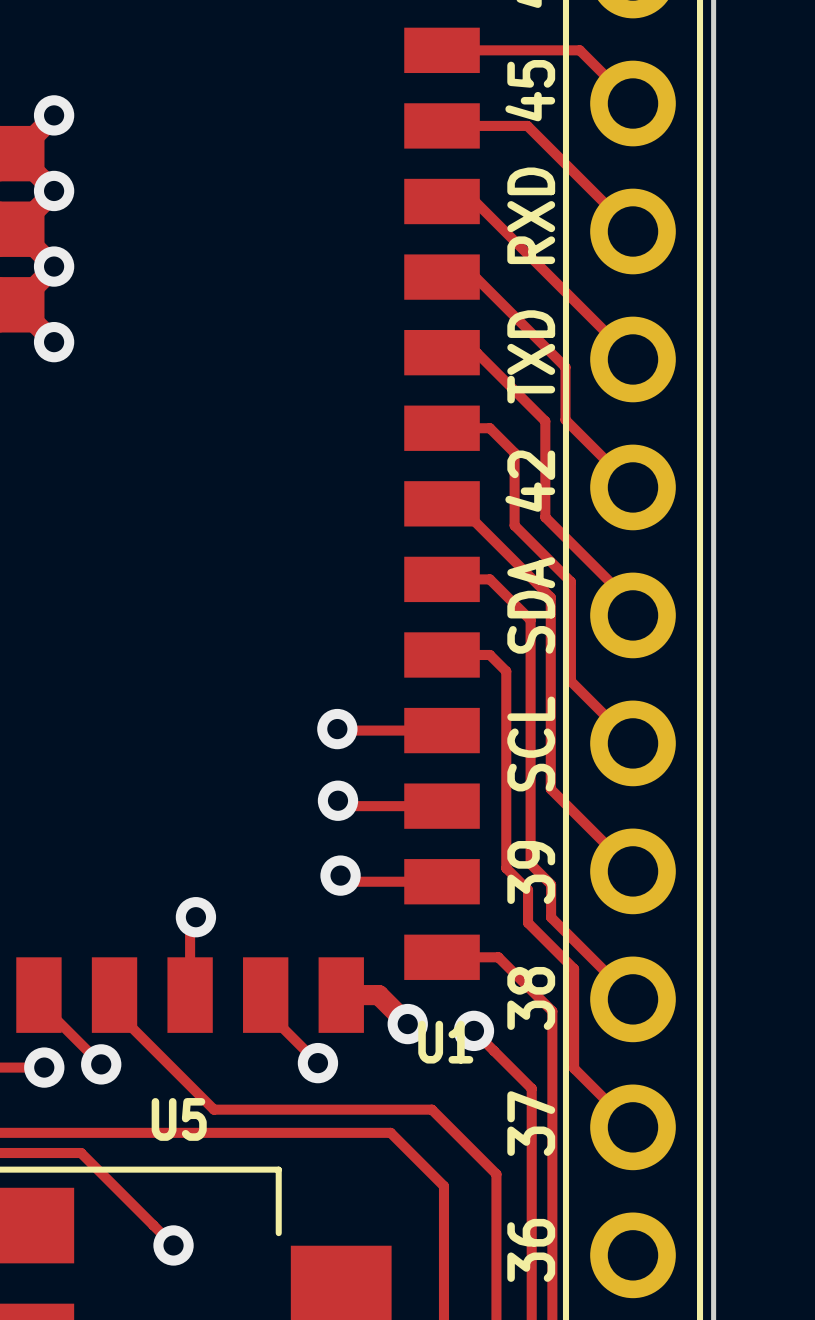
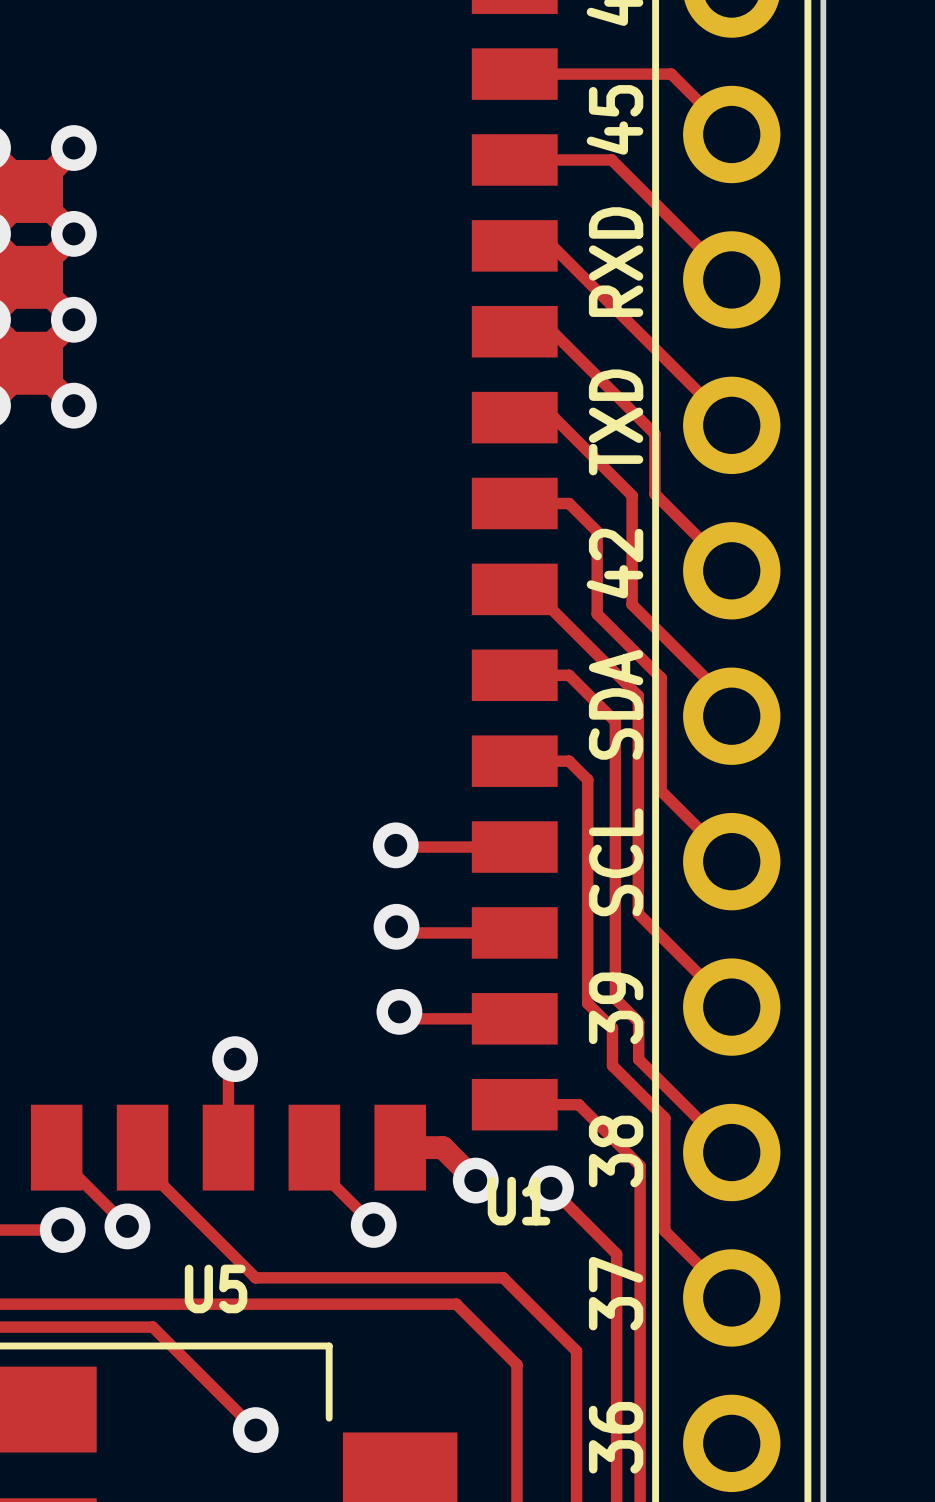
track: (81, 1153) (173, 1245) -> (104, 1327) (152, 1327) (255, 1430)
via position: (173, 1245) -> (255, 1430)

